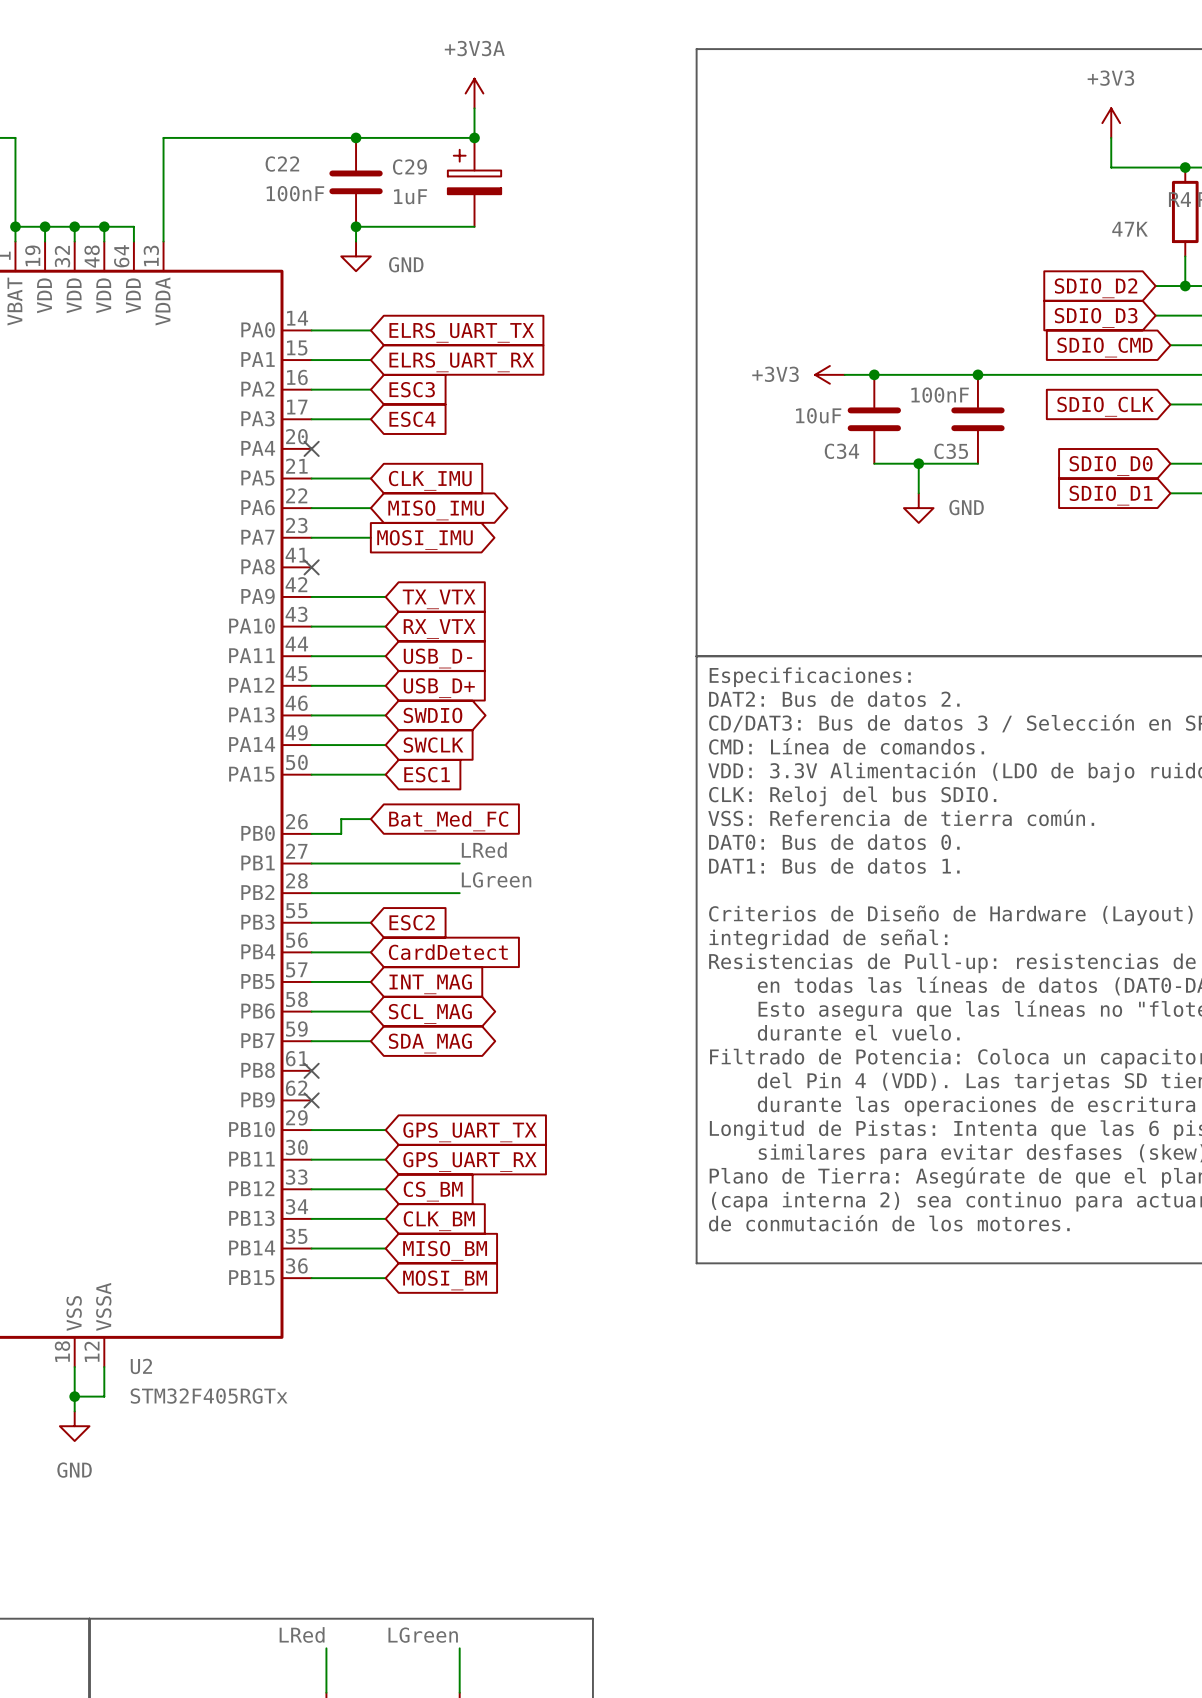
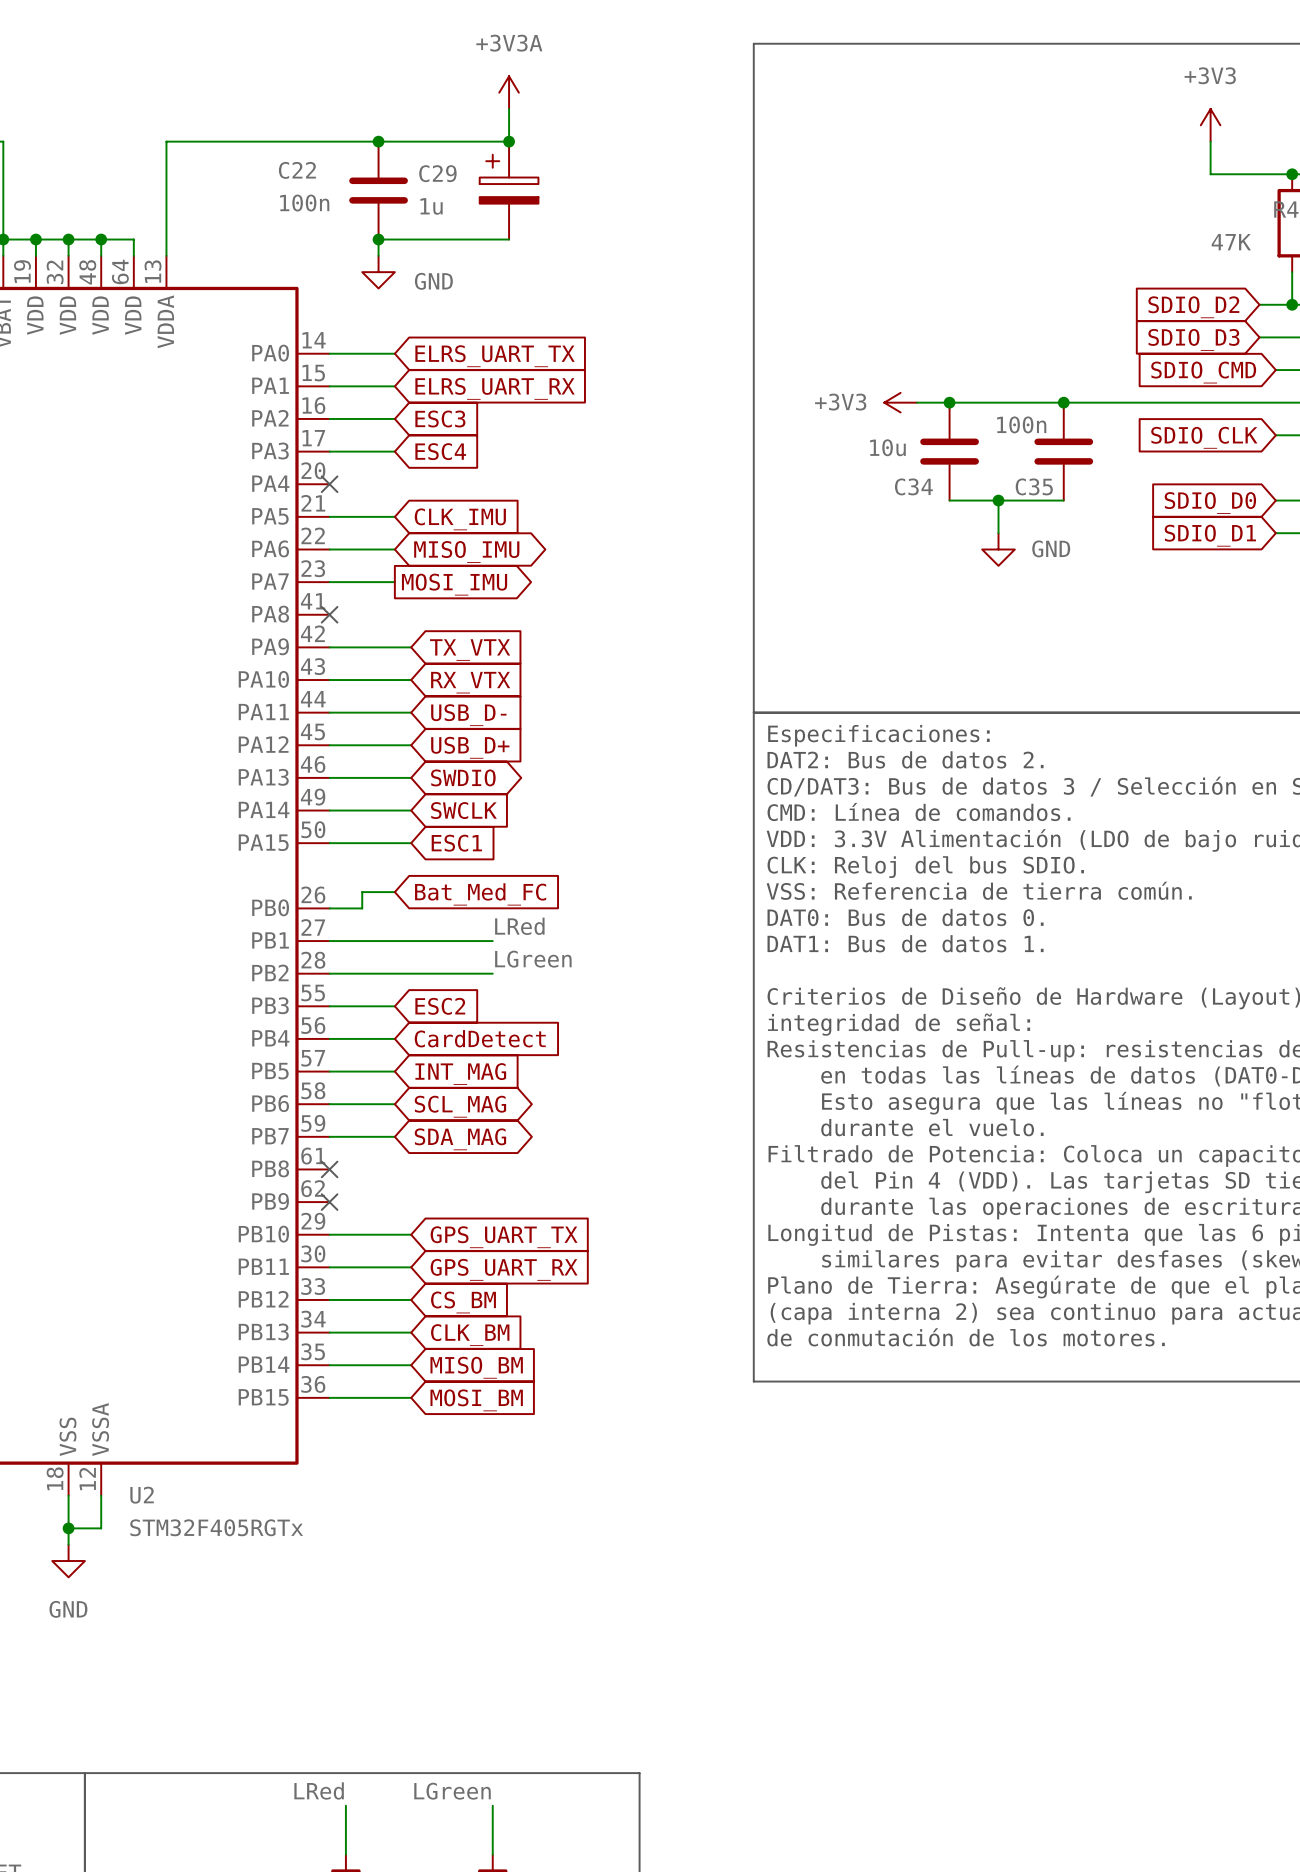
C22 value: 100nF (295, 193) -> 100n (304, 203)
C29 value: 1uF (410, 196) -> 1u (431, 206)
C35 value: 100nF (940, 395) -> 100n (1021, 424)
C34 value: 10uF (818, 415) -> 10u (887, 447)

